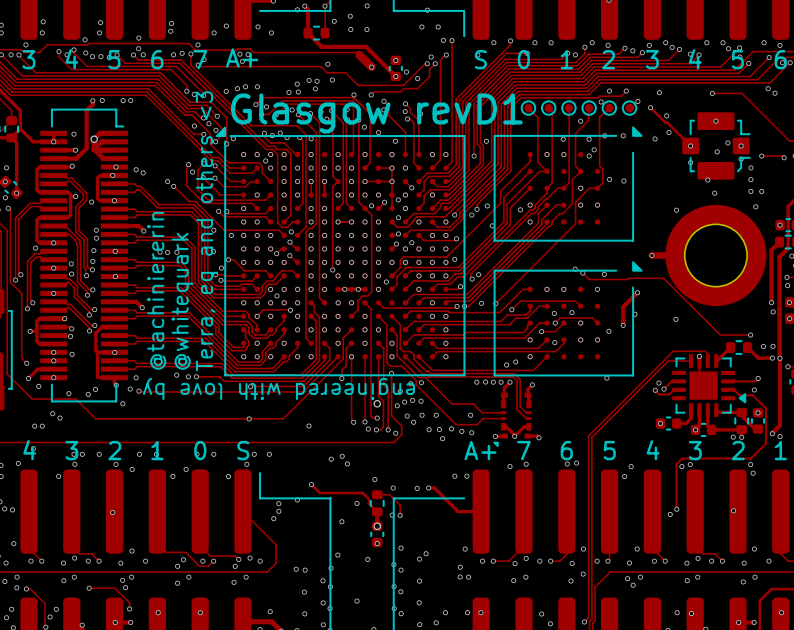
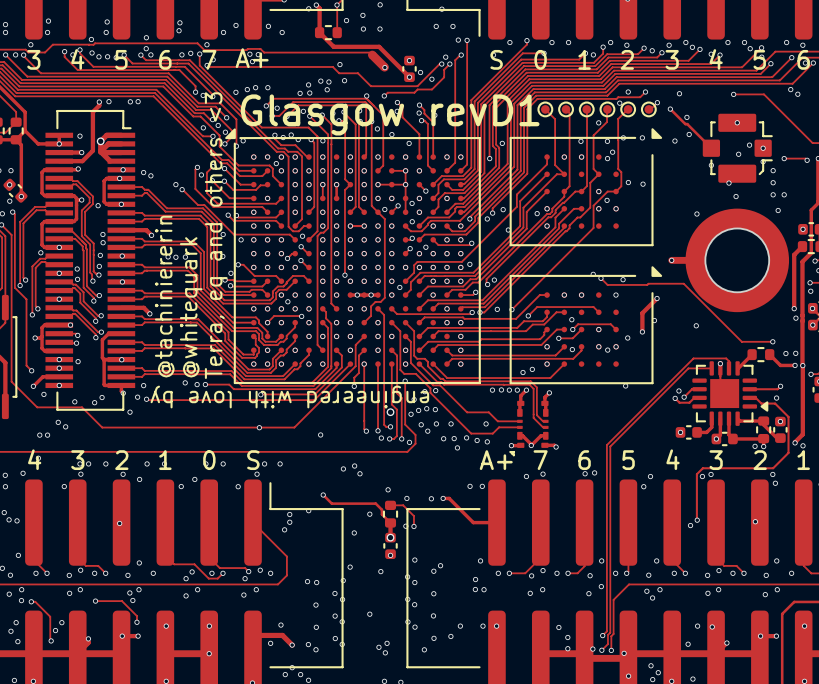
via: (690, 145) -> none
via: none -> (607, 200)
via position: (572, 312) -> (607, 350)

